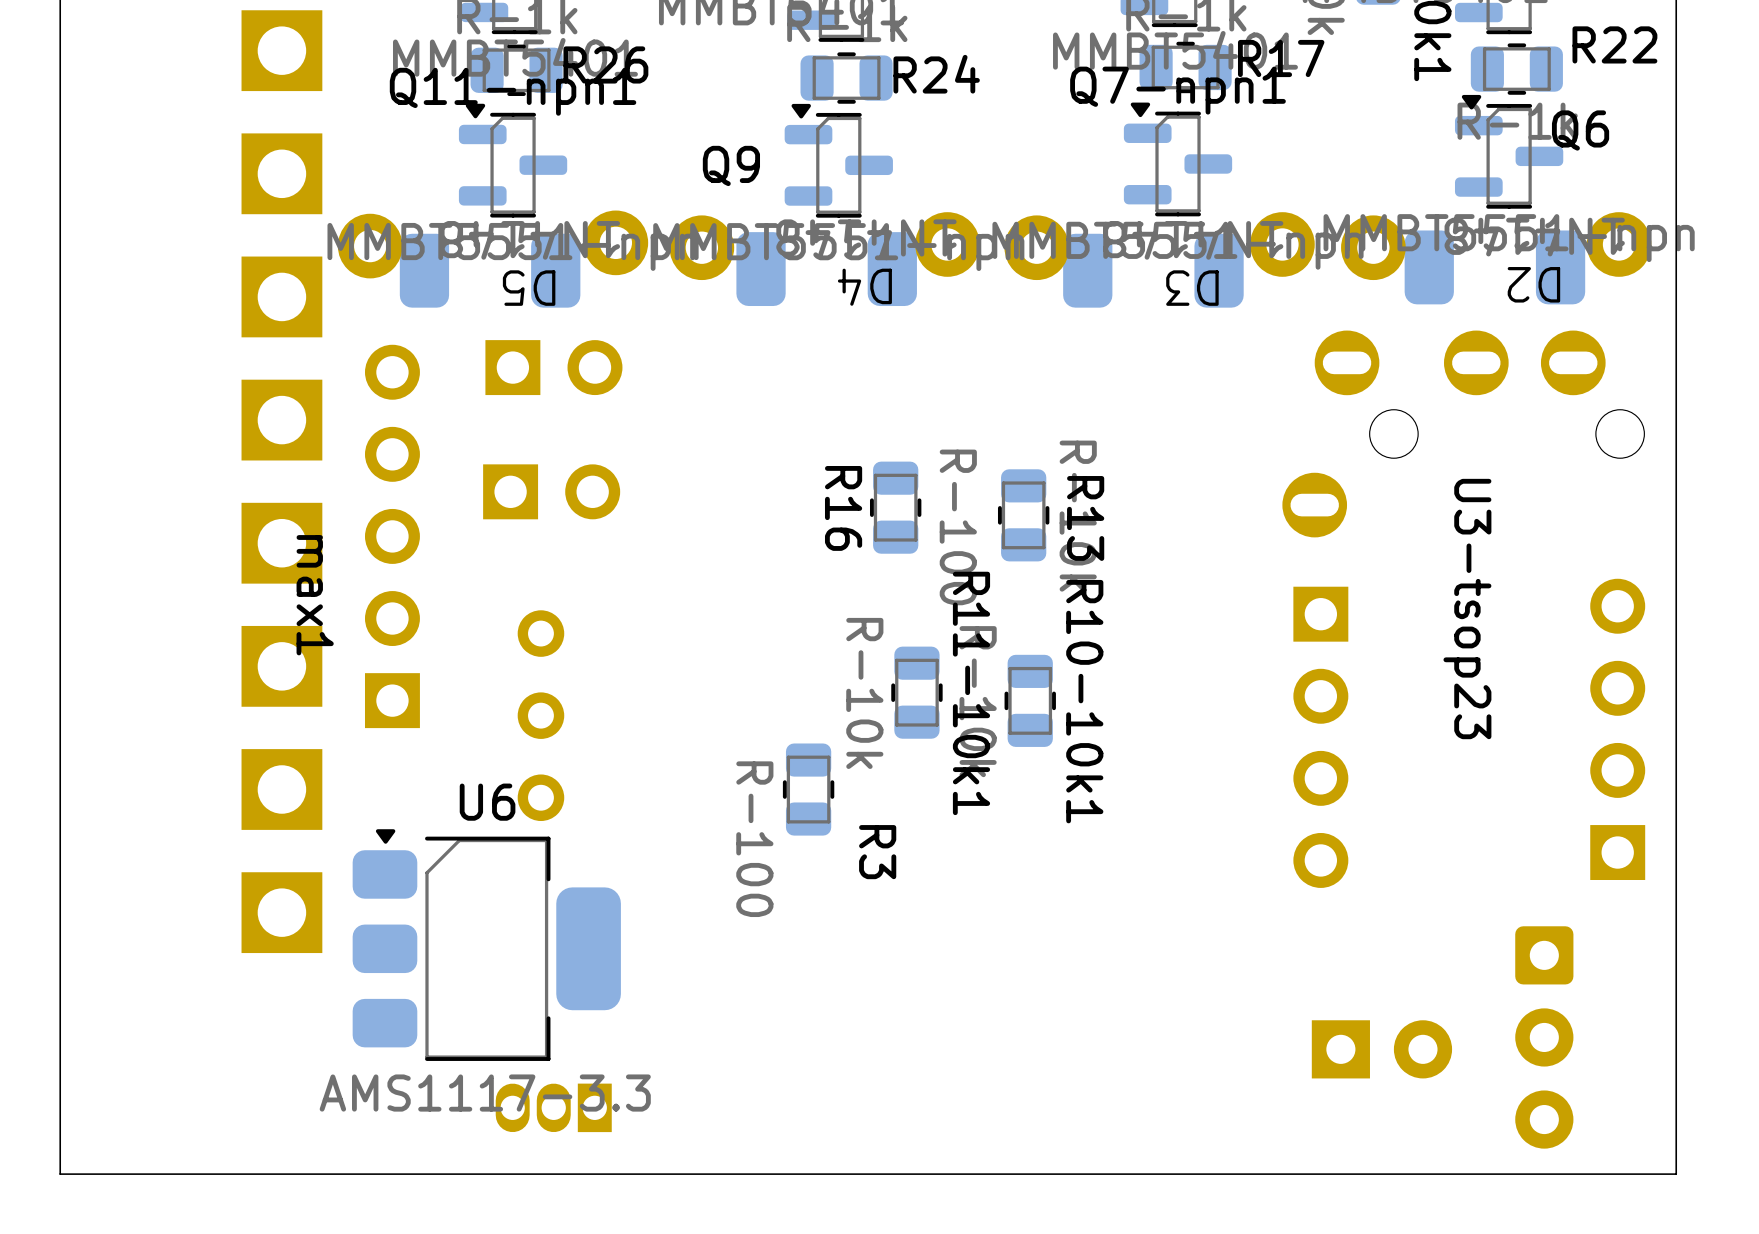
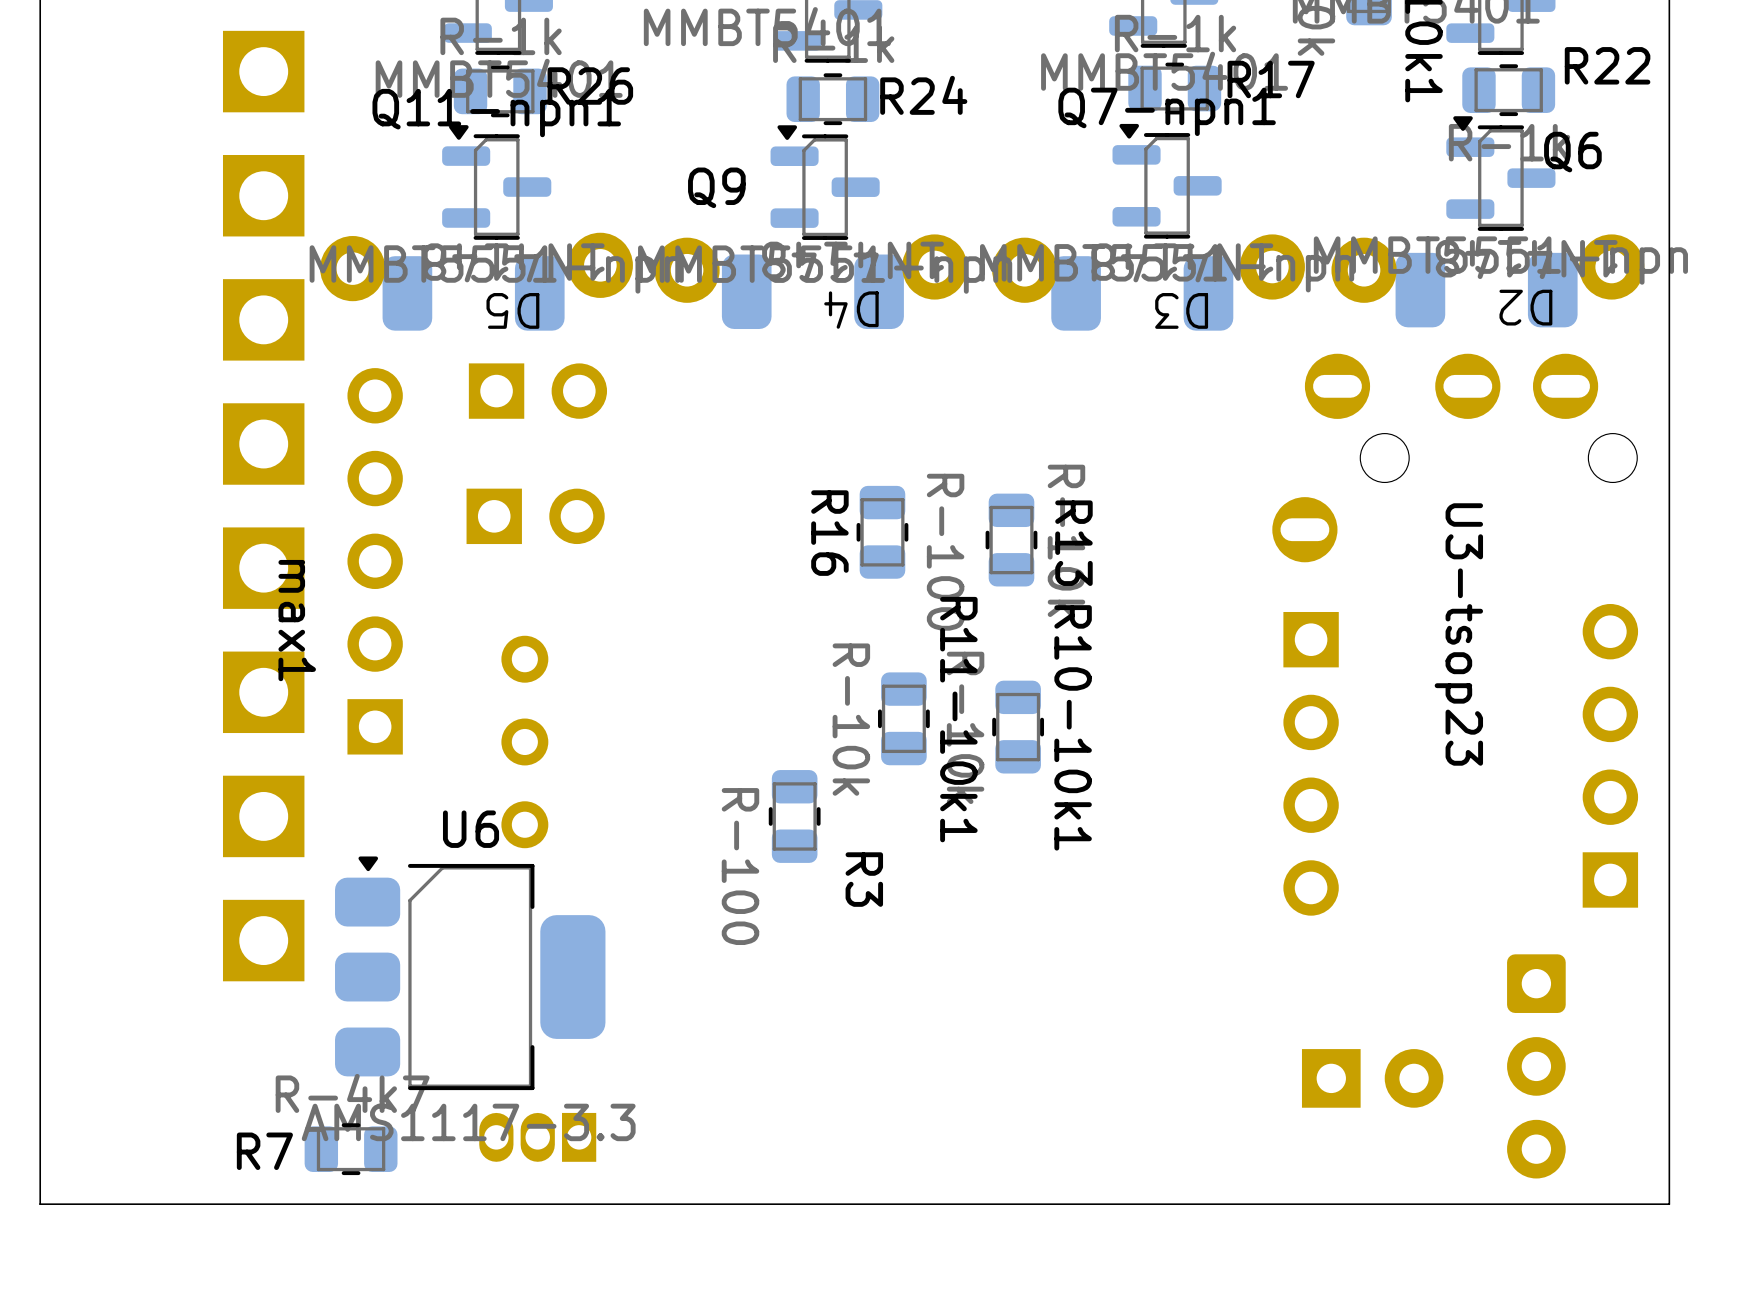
R7: none -> R-4k7 (351, 1149)

